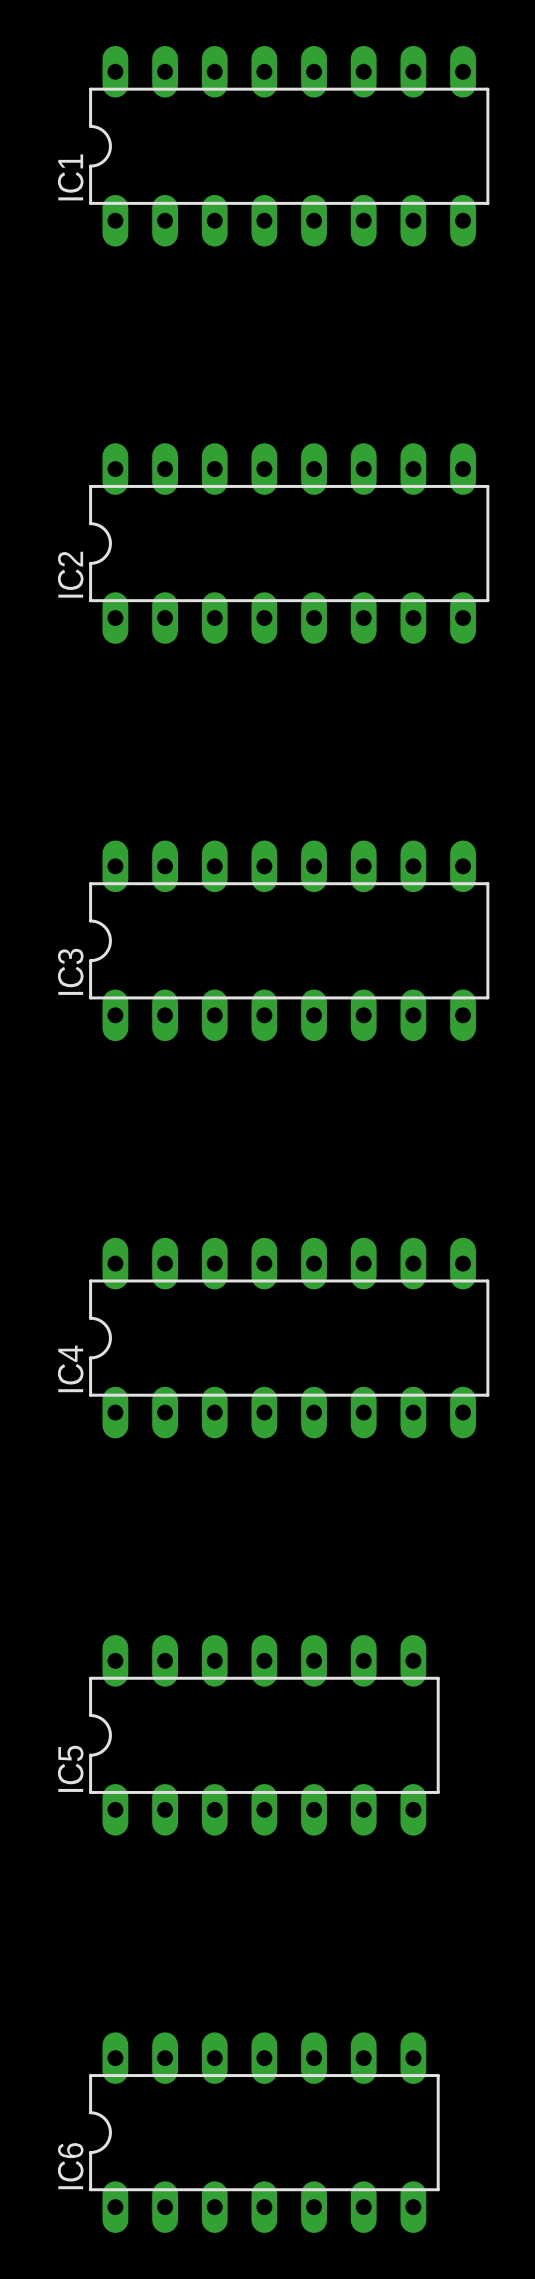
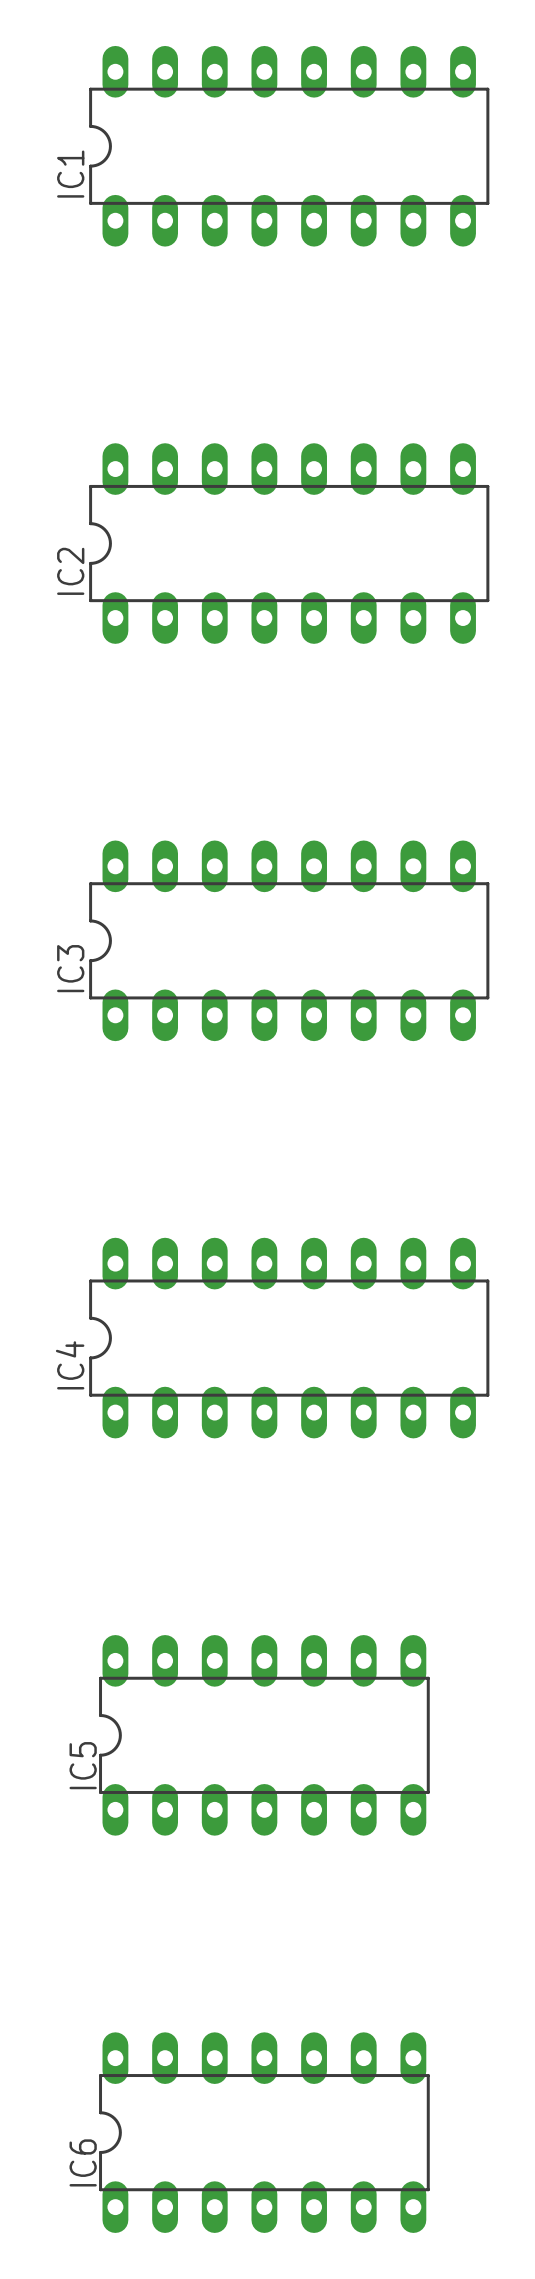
IC5 footprint: [89, 1635, 440, 1836] -> [99, 1635, 430, 1836]
IC5 name position: IC5 (70, 1768) -> IC5 (83, 1765)
IC6 footprint: [89, 2032, 440, 2233] -> [99, 2032, 430, 2233]
IC6 name position: IC6 (70, 2166) -> IC6 (83, 2162)

